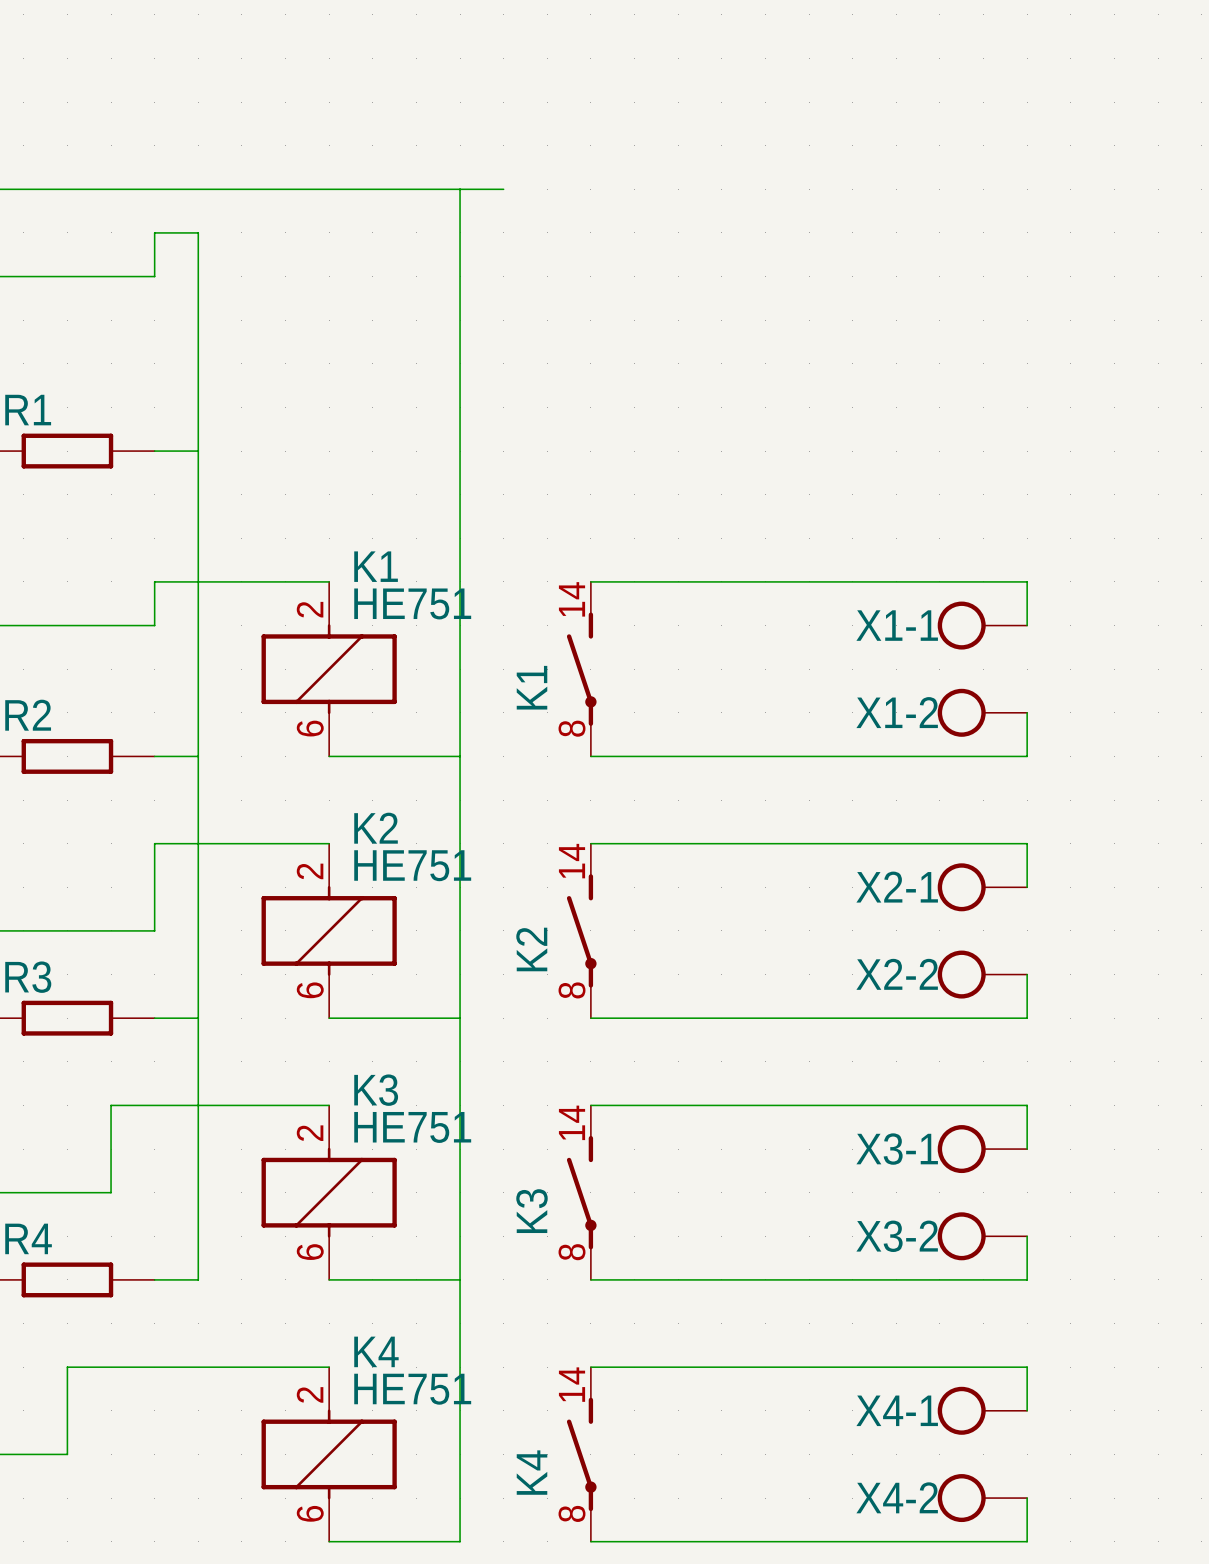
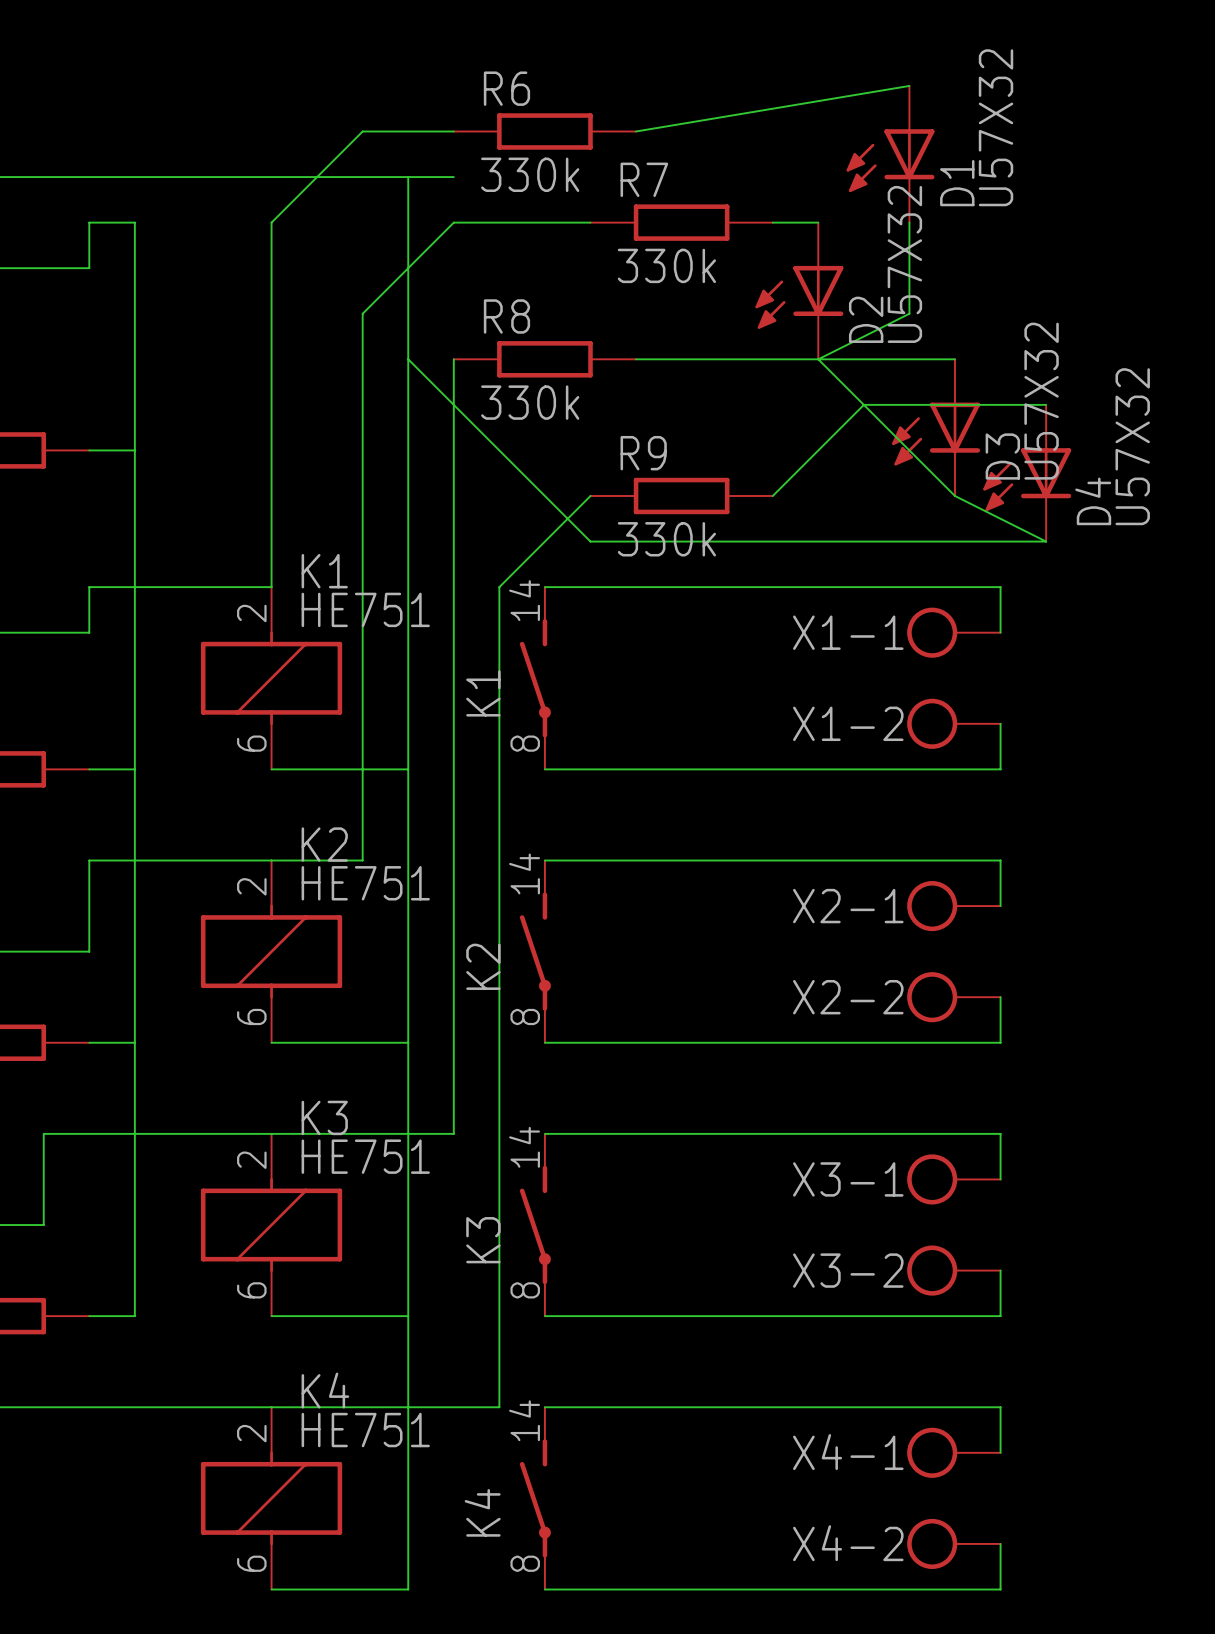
wire: none -> (909, 85) (636, 131)
wire: none -> (453, 131) (362, 131) (271, 222) (271, 587)
R6: none -> 330k (544, 131)
D1: none -> U57X32 (890, 154)
wire: none -> (590, 222) (453, 222) (362, 313) (362, 860) (271, 860)
R7: none -> 330k (681, 222)
wire: none -> (772, 222) (818, 222)
wire: none -> (909, 222) (909, 313) (818, 359) (955, 496) (1046, 541) (590, 541) (408, 359)
D2: none -> U57X32 (799, 290)
wire: none -> (453, 359) (453, 1133) (271, 1133)
R8: none -> 330k (544, 359)
wire: none -> (636, 359) (955, 359)
wire: none -> (1046, 404) (863, 404) (772, 496)
D3: none -> U57X32 (936, 427)
D4: none -> U57X32 (1027, 473)
wire: none -> (590, 496) (499, 587) (499, 1407) (271, 1407)
R9: none -> 330k (681, 496)

